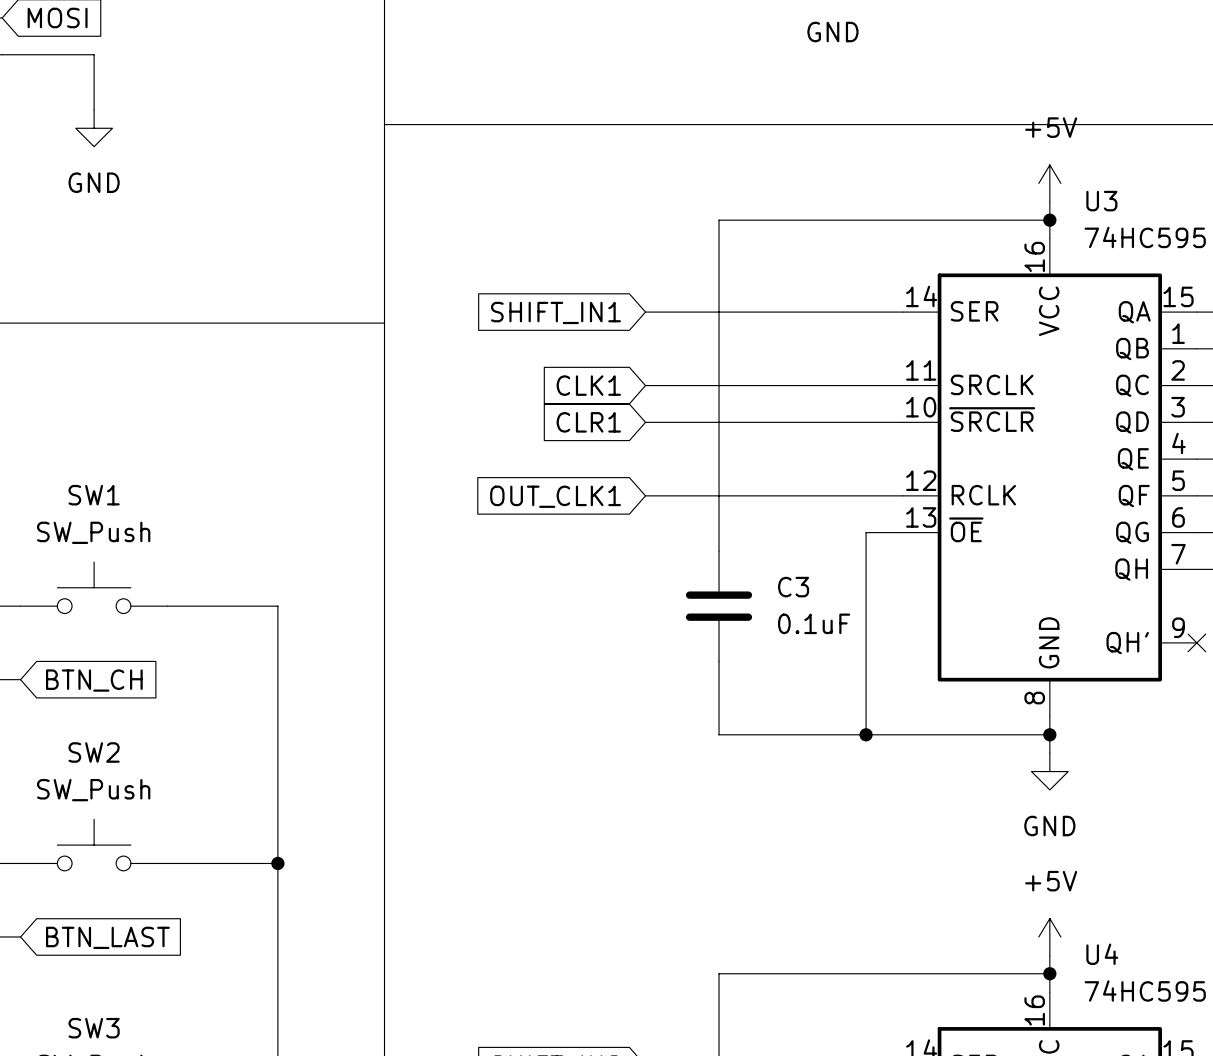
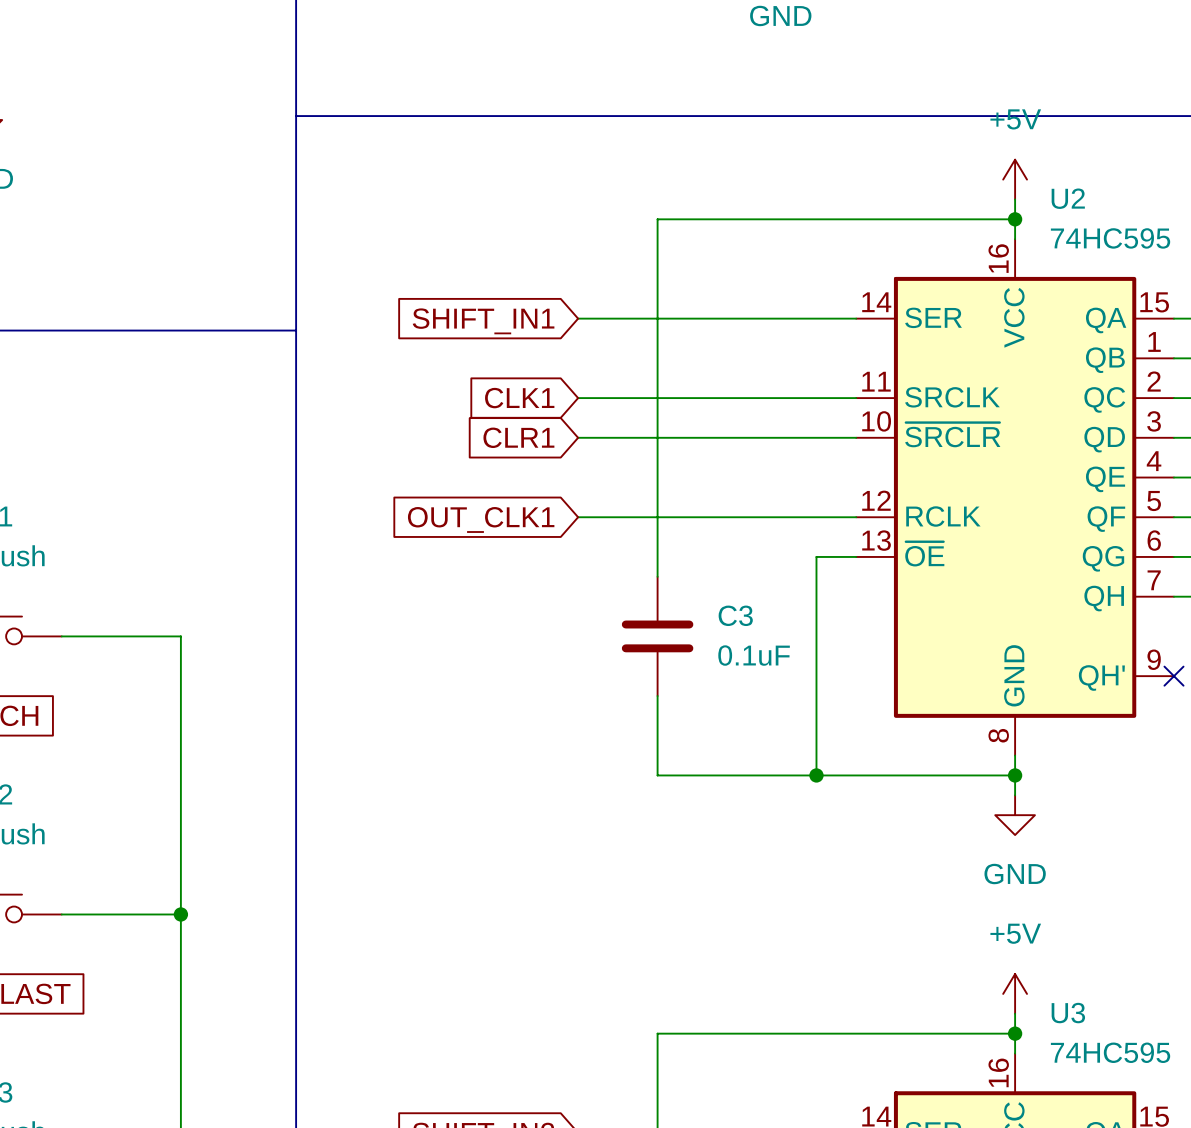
U3 name: U3 (1101, 201) -> U2 (1068, 198)
U4 name: U4 (1102, 954) -> U3 (1068, 1013)

